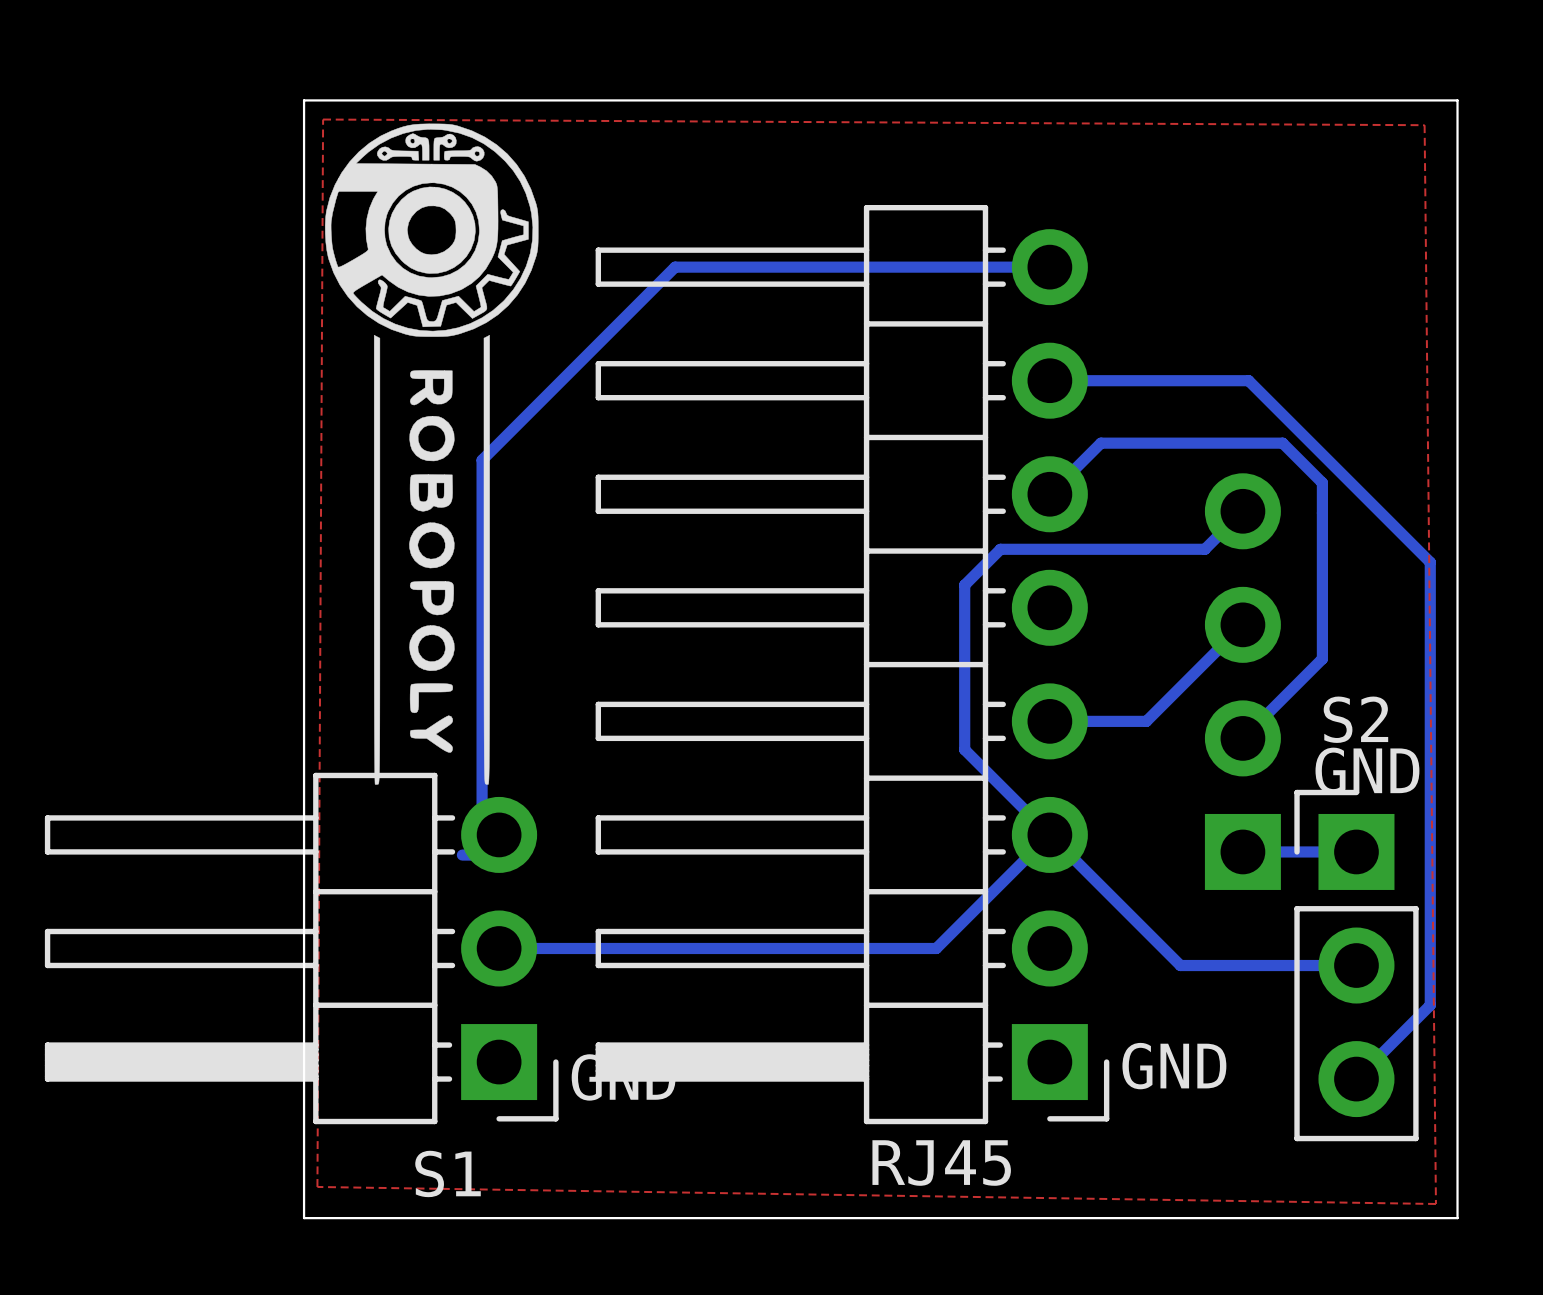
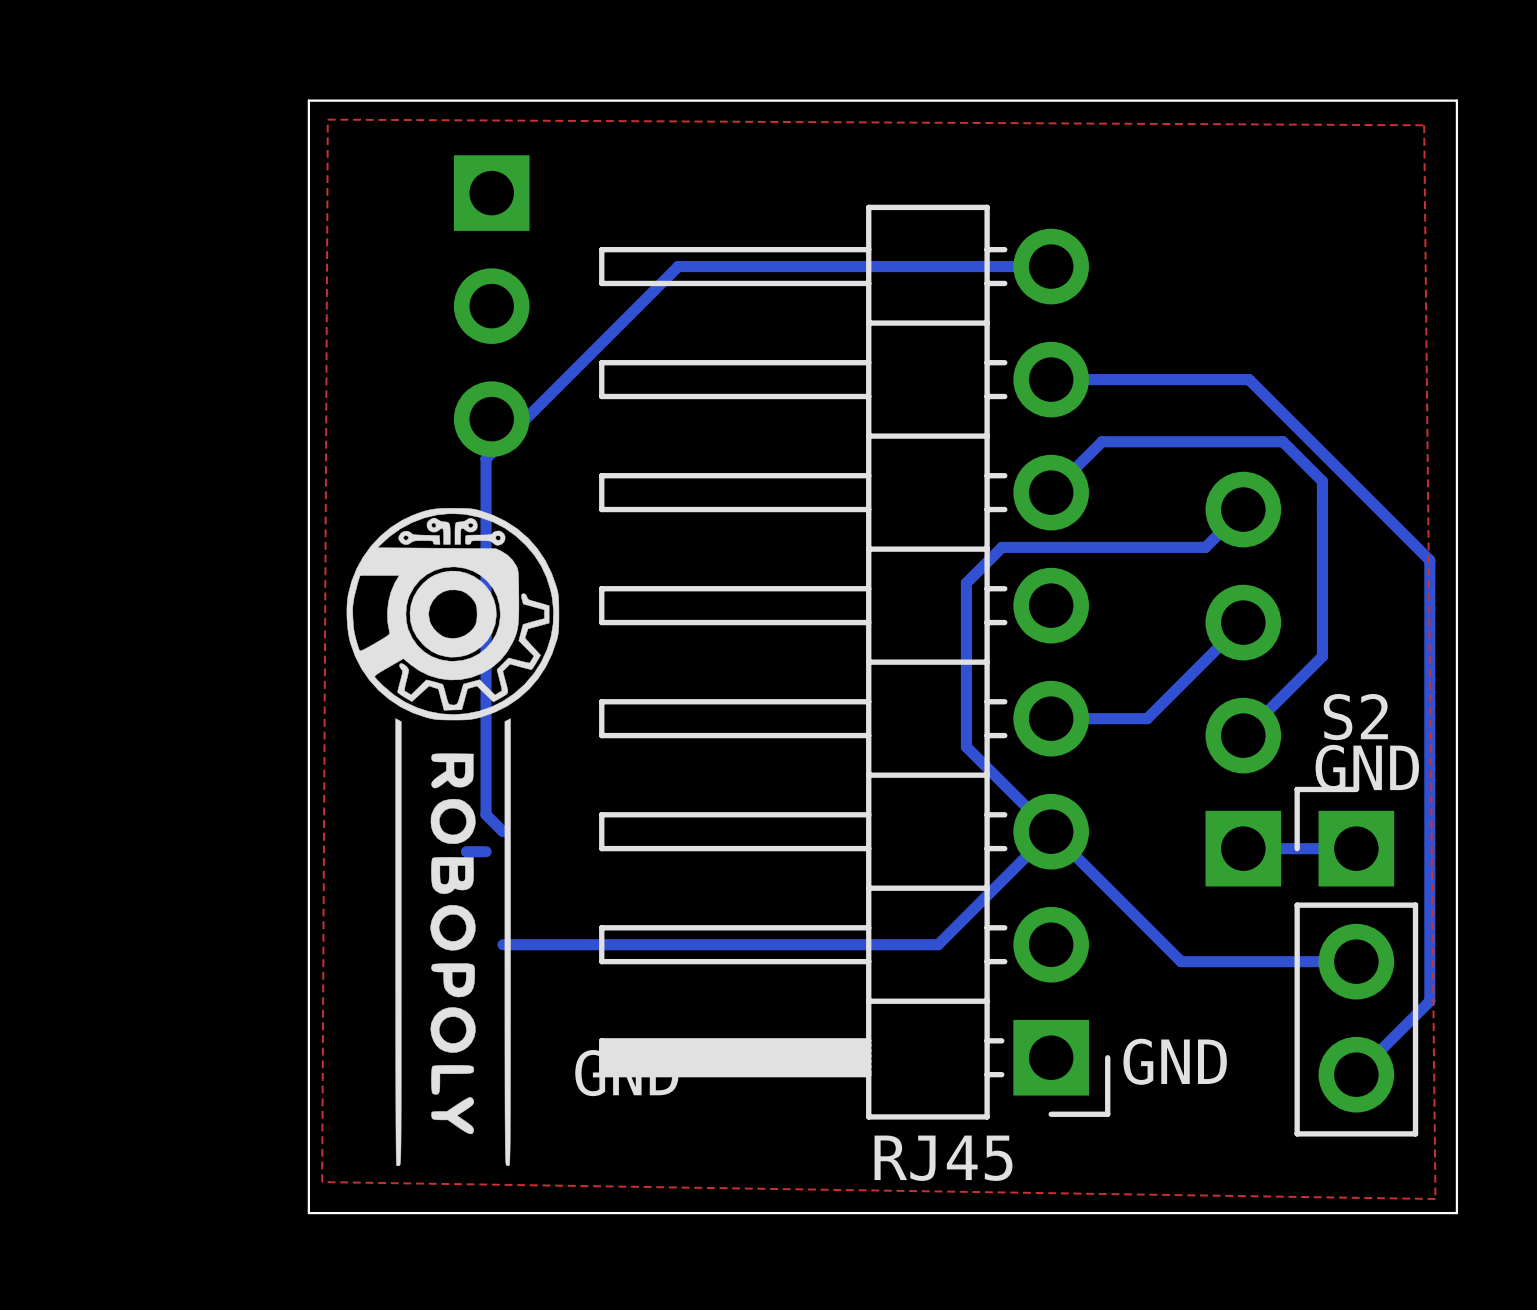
drawing position: (431, 454) -> (452, 837)
S1 side: top (301, 948) -> bottom (491, 306)

